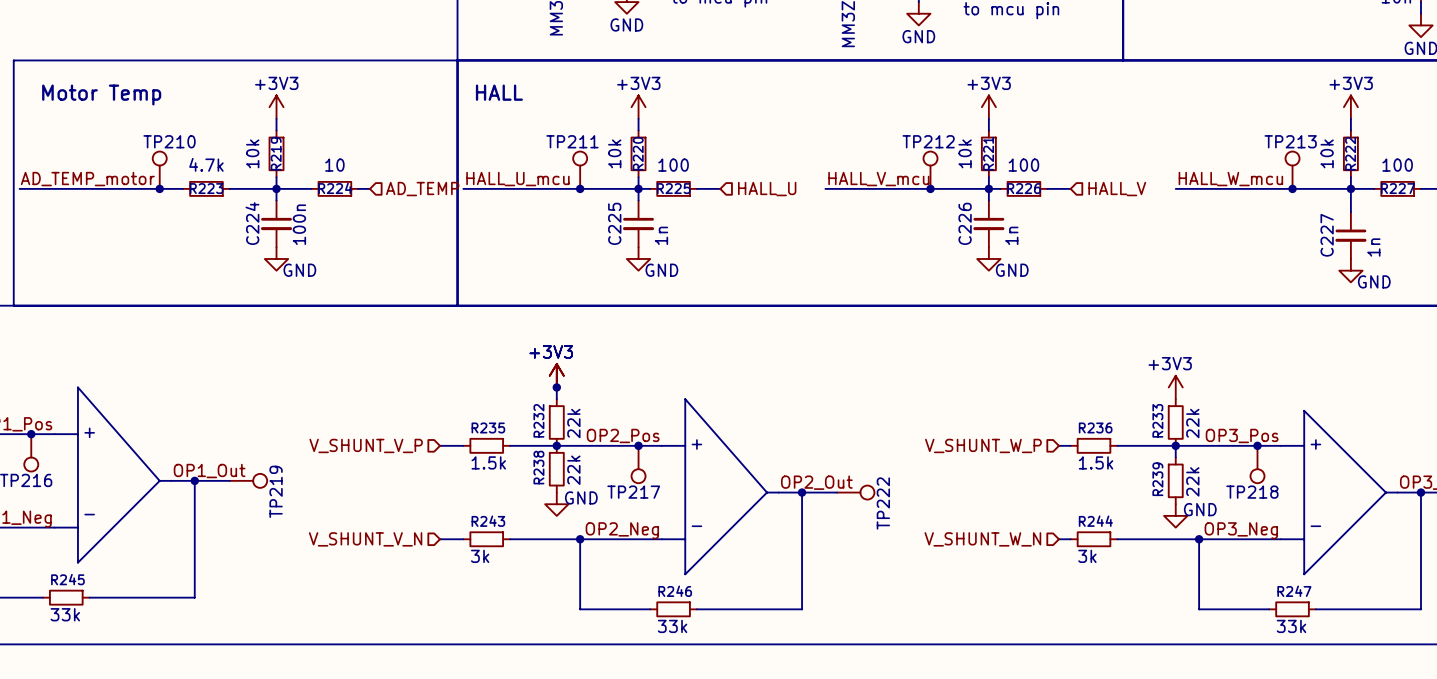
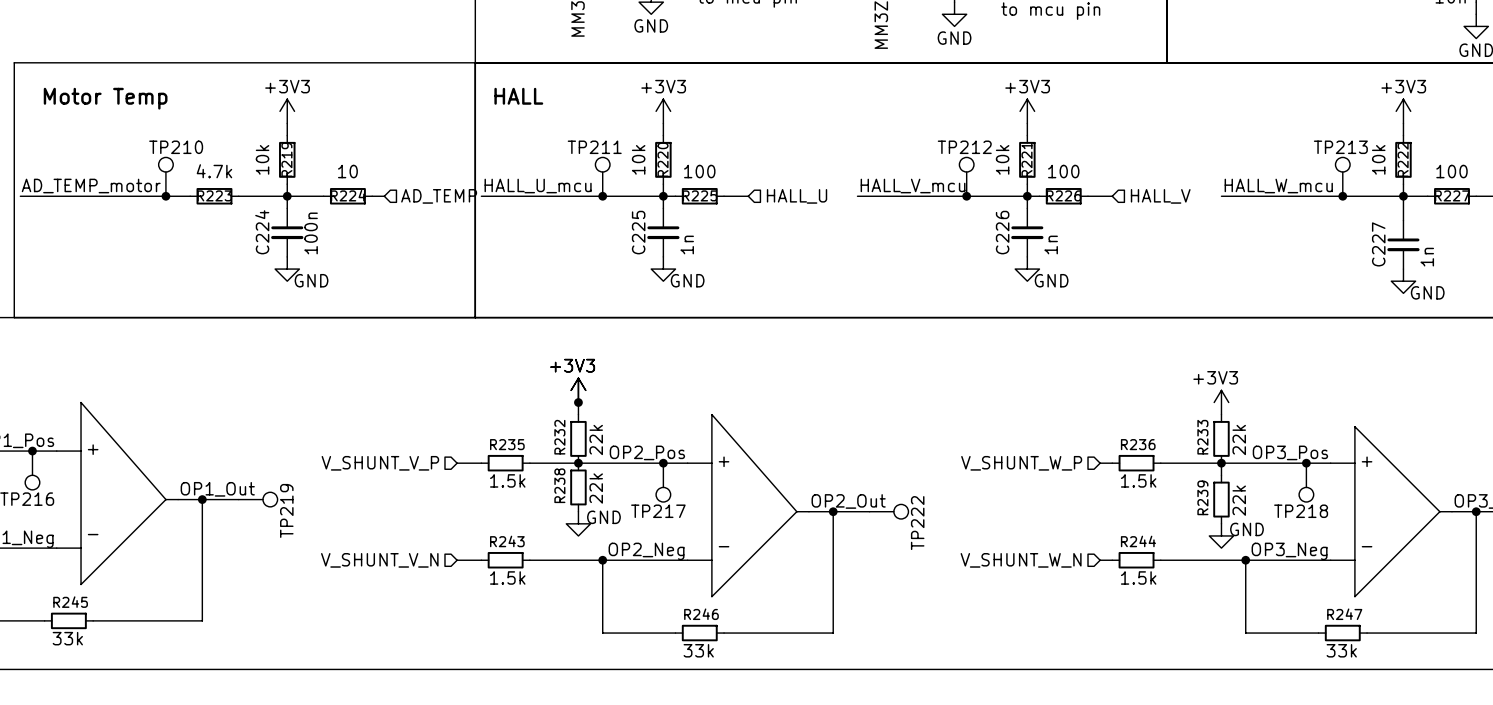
R243 value: 3k (480, 556) -> 1.5k (507, 577)
R244 value: 3k (1087, 556) -> 1.5k (1138, 577)

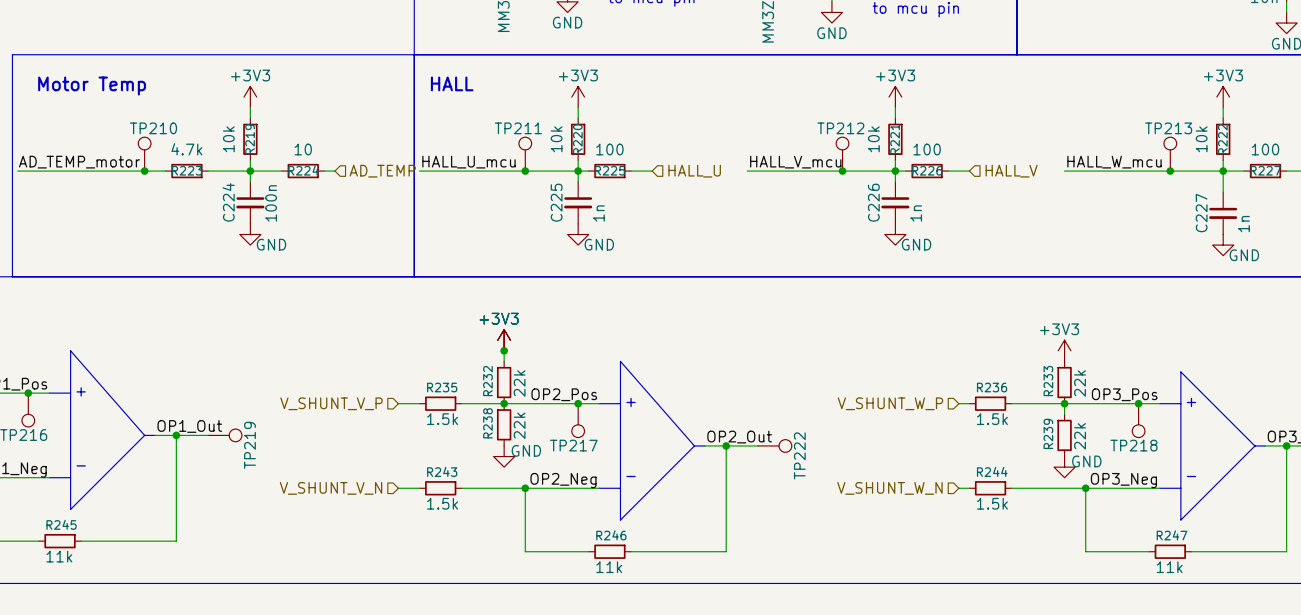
R245 value: 33k (67, 638) -> 11k (59, 556)
R246 value: 33k (698, 650) -> 11k (609, 567)
R247 value: 33k (1341, 650) -> 11k (1169, 567)

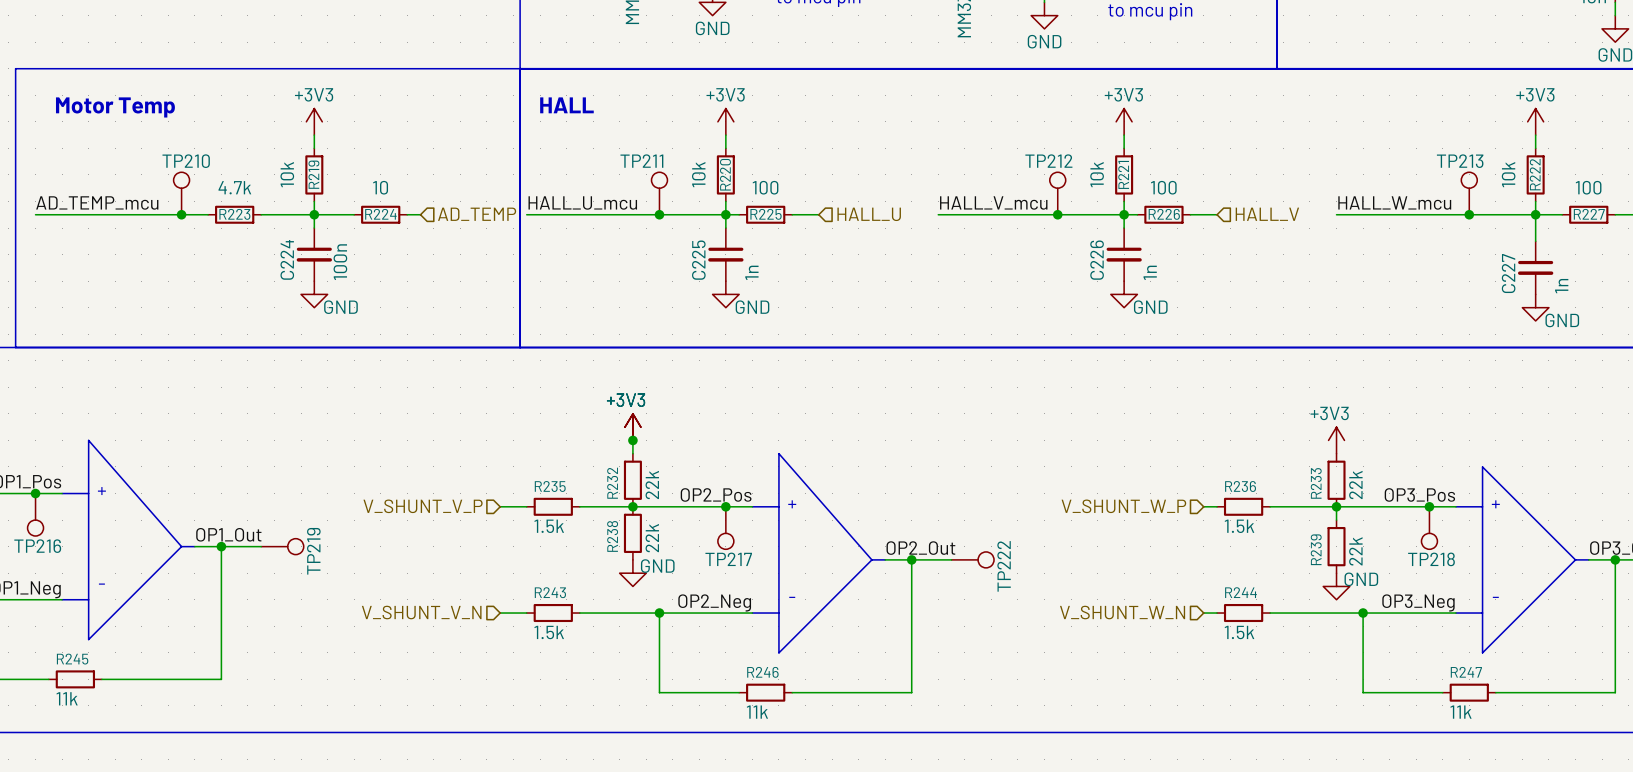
label: AD_TEMP_motor (79, 162) -> AD_TEMP_mcu (97, 202)
wire: (17, 171) (28, 171) -> none

